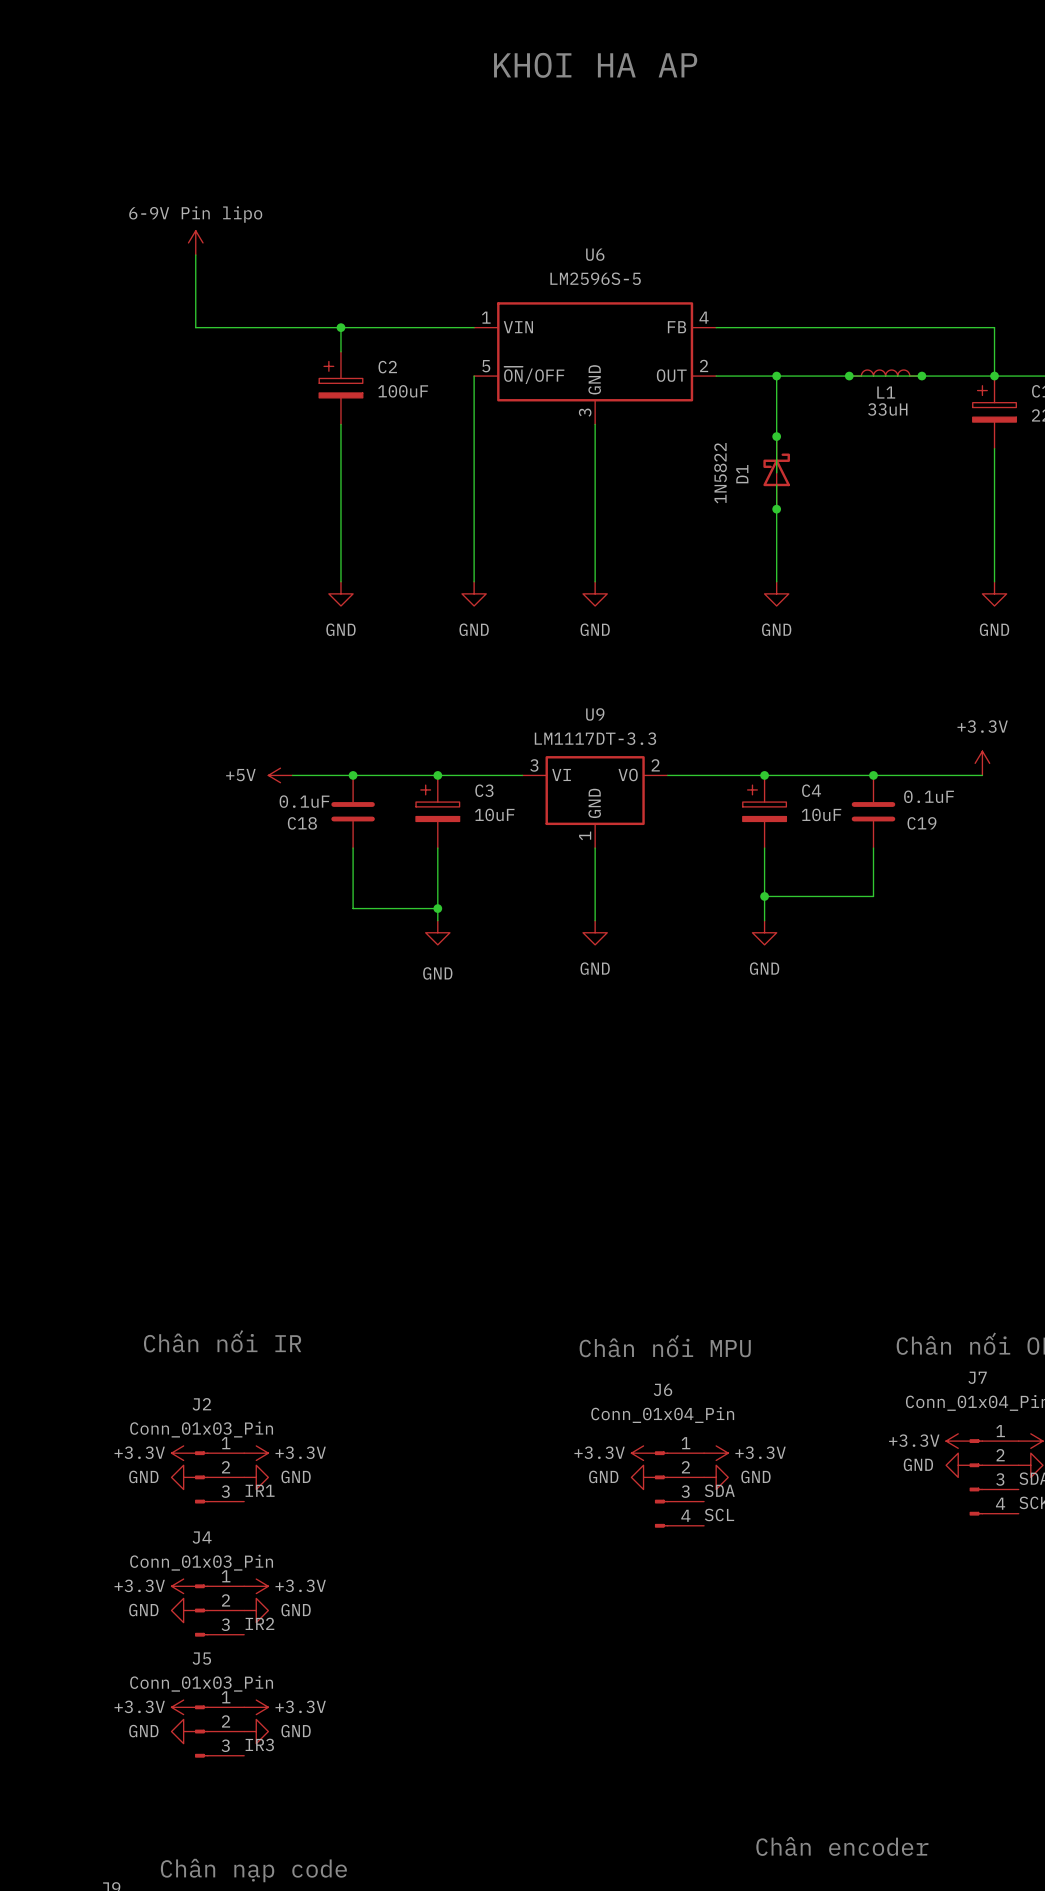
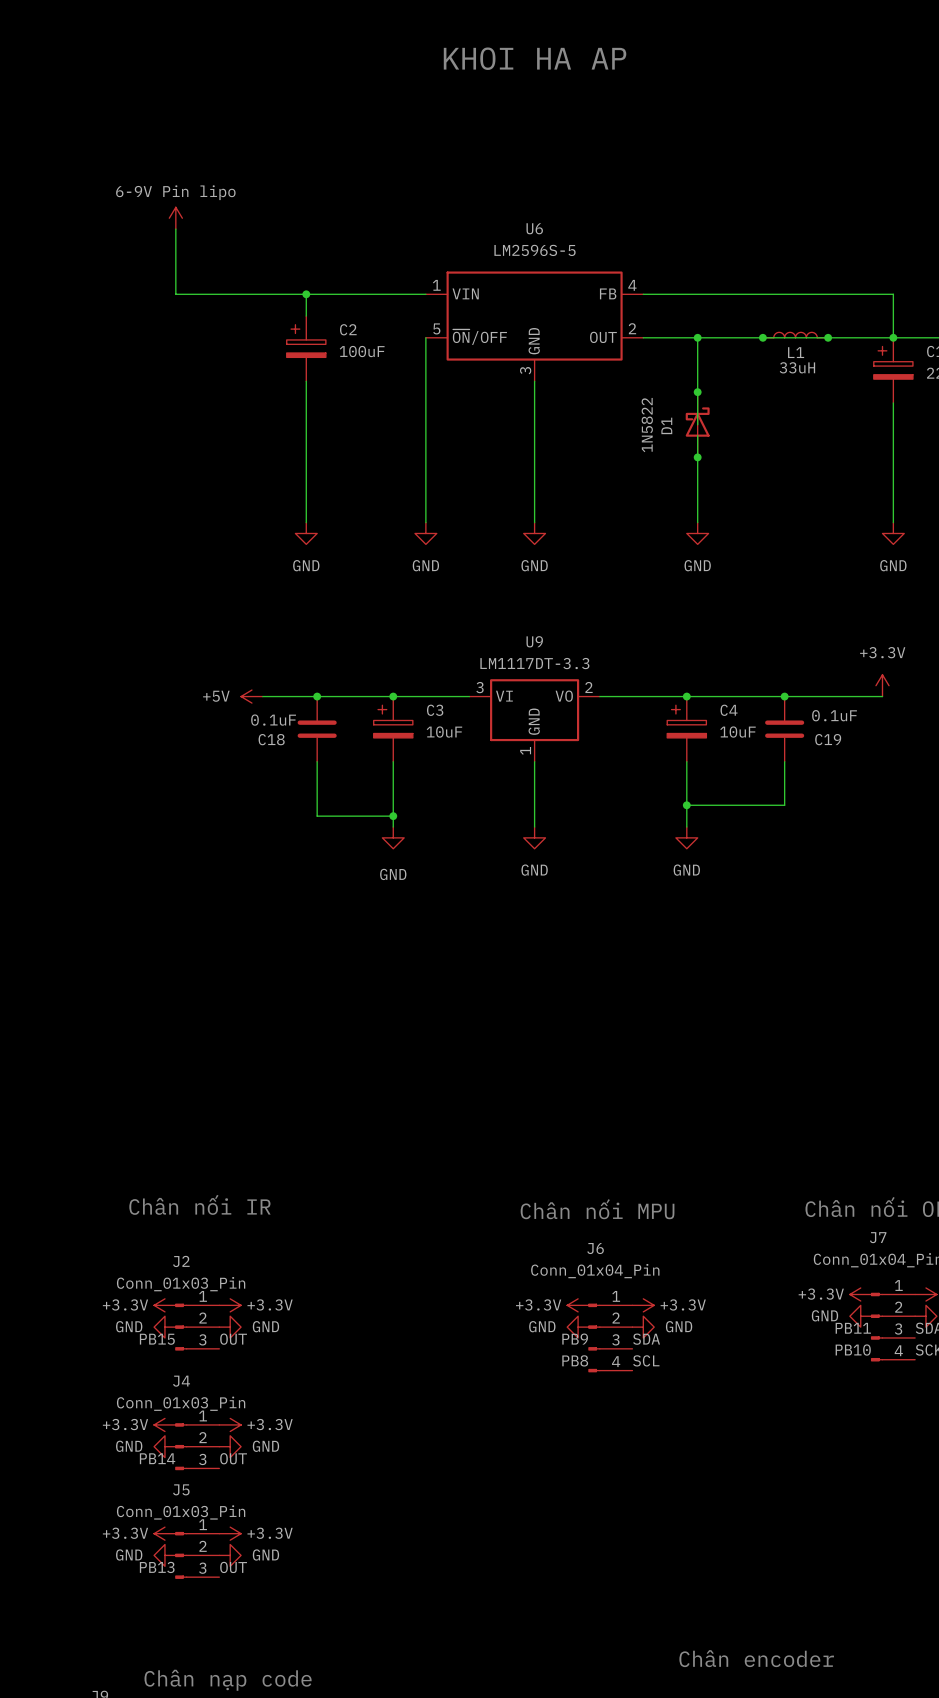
label: none -> PB11 (853, 1328)
label: none -> PB15 (157, 1339)
label: IR1 (260, 1490) -> OUT (233, 1339)
label: none -> PB9 (575, 1339)
label: none -> PB10 (853, 1350)
label: none -> PB8 (575, 1360)
label: none -> PB14 (157, 1458)
label: IR2 (259, 1623) -> OUT (233, 1458)
label: none -> PB13 (157, 1567)
label: IR3 (259, 1744) -> OUT (233, 1567)

